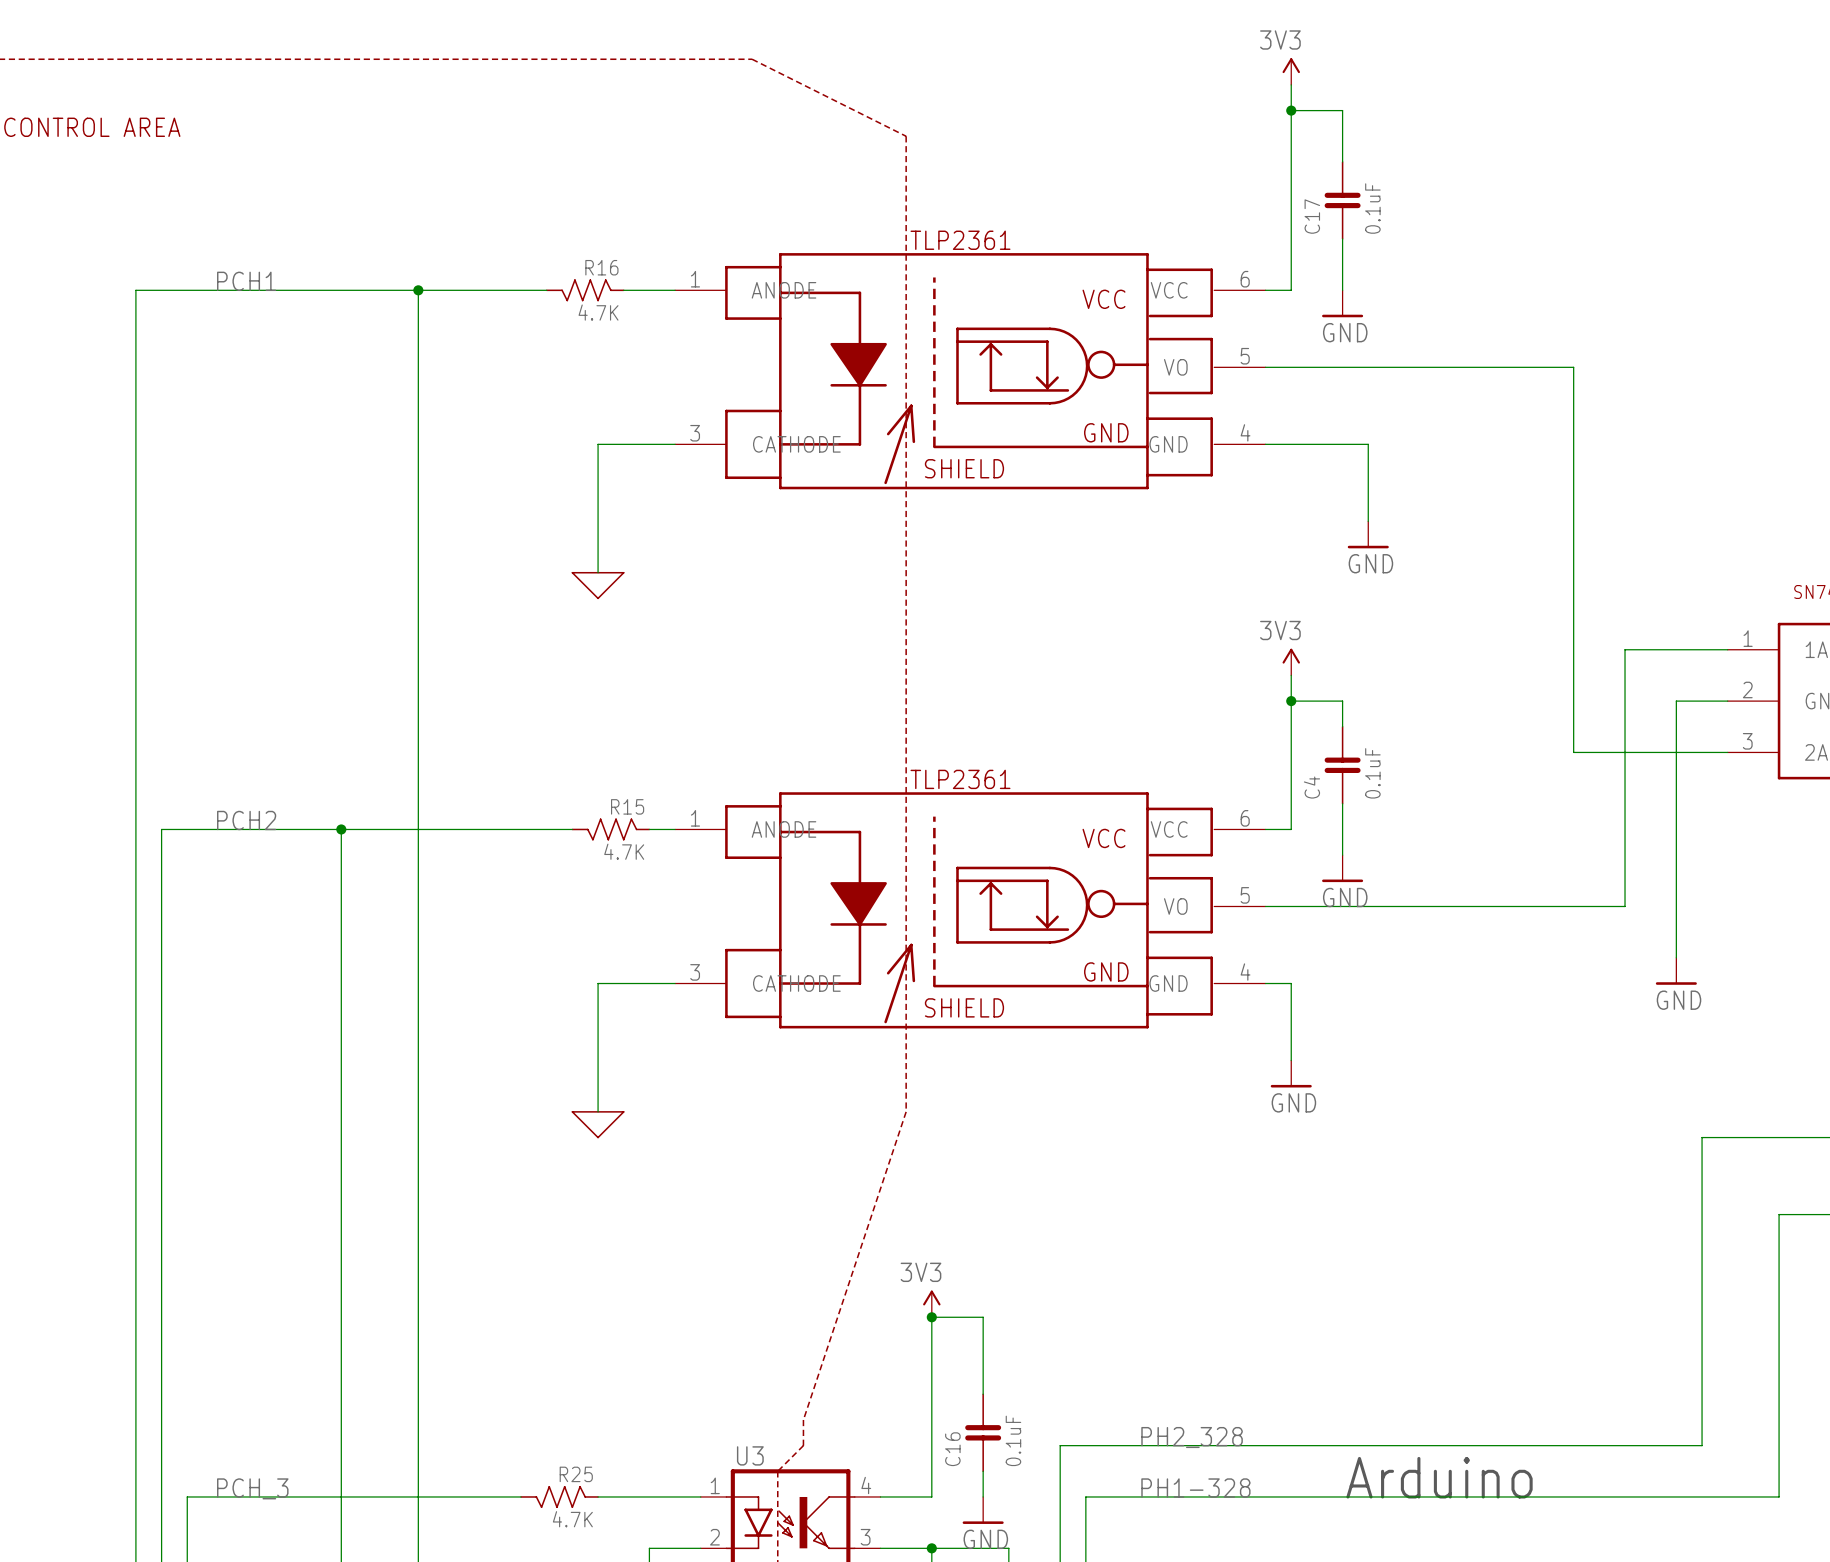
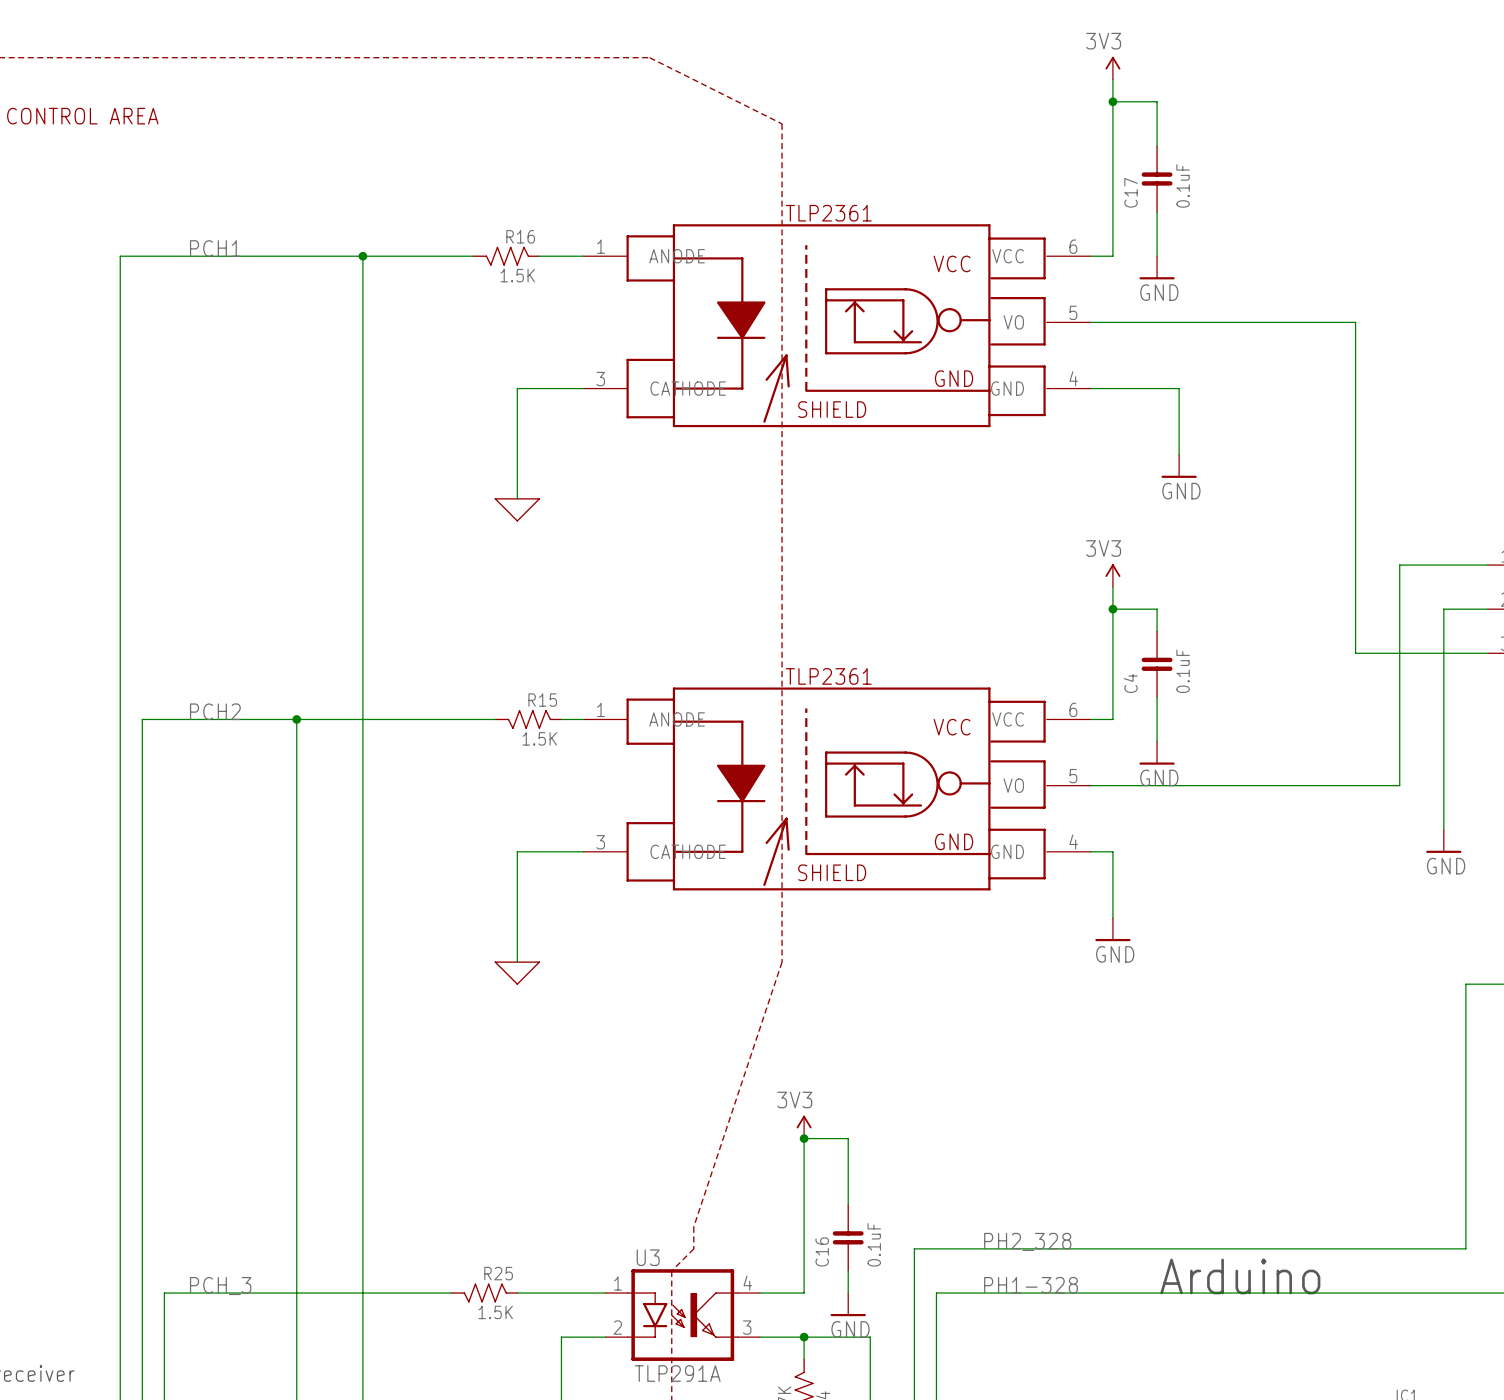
R16 value: 4.7K (598, 312) -> 1.5K (517, 275)
R15 value: 4.7K (624, 851) -> 1.5K (539, 738)
R25 value: 4.7K (572, 1519) -> 1.5K (495, 1312)

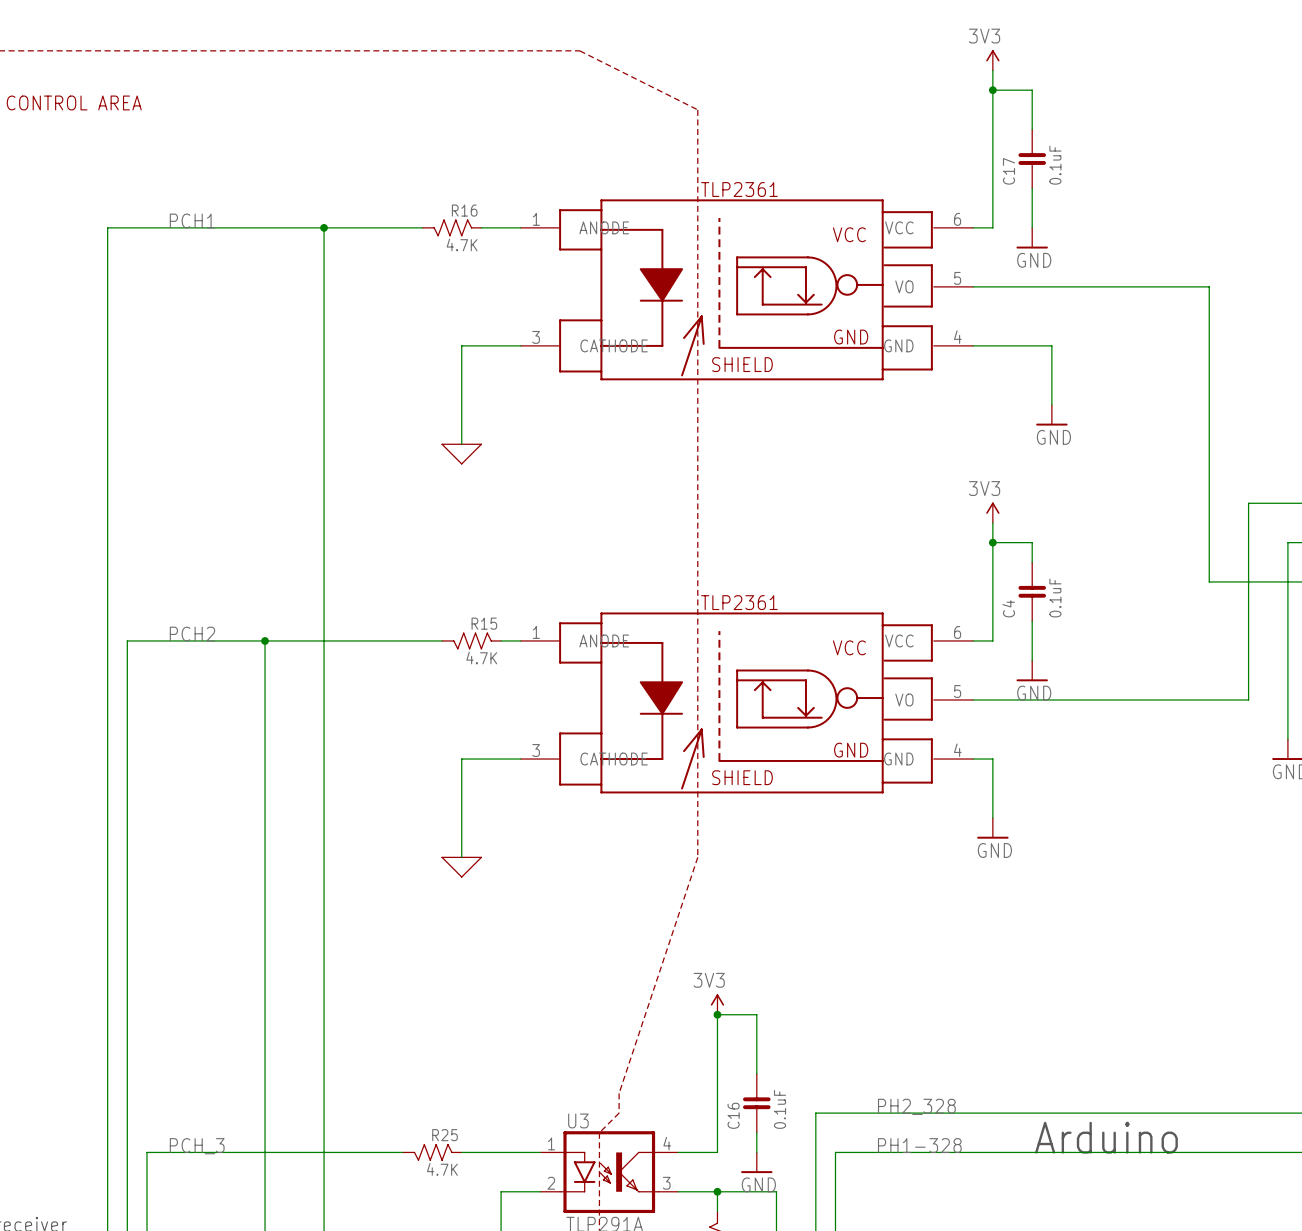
R16 value: 1.5K (517, 275) -> 4.7K (462, 244)
R15 value: 1.5K (539, 738) -> 4.7K (481, 658)
R25 value: 1.5K (495, 1312) -> 4.7K (442, 1169)

